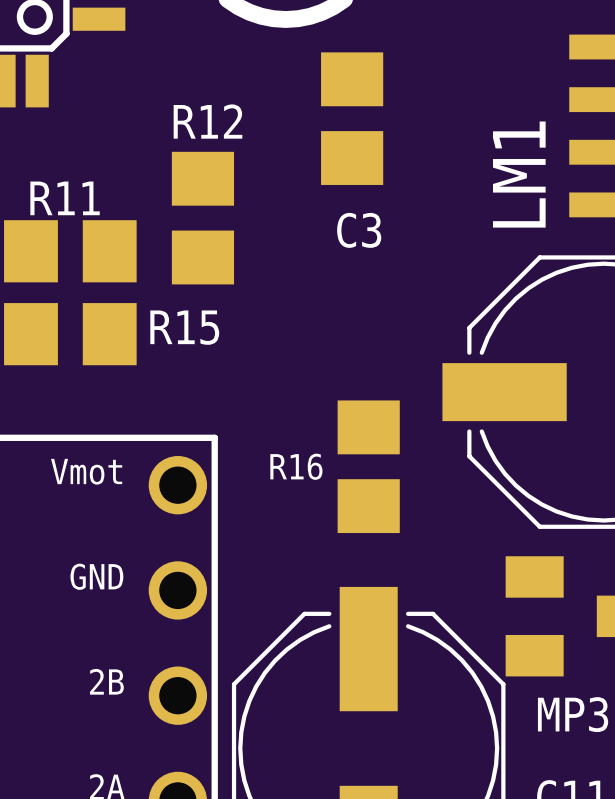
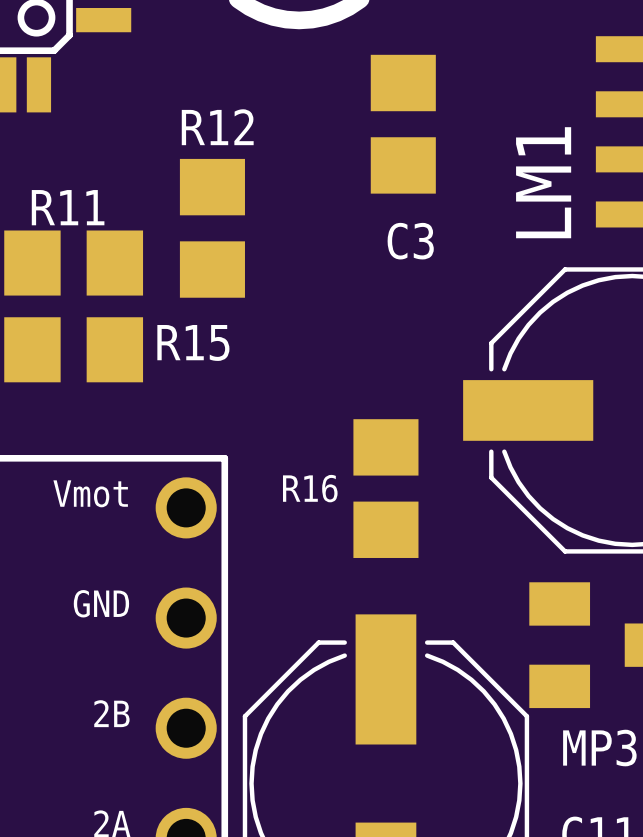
C3 position: (352, 118) -> (403, 124)

